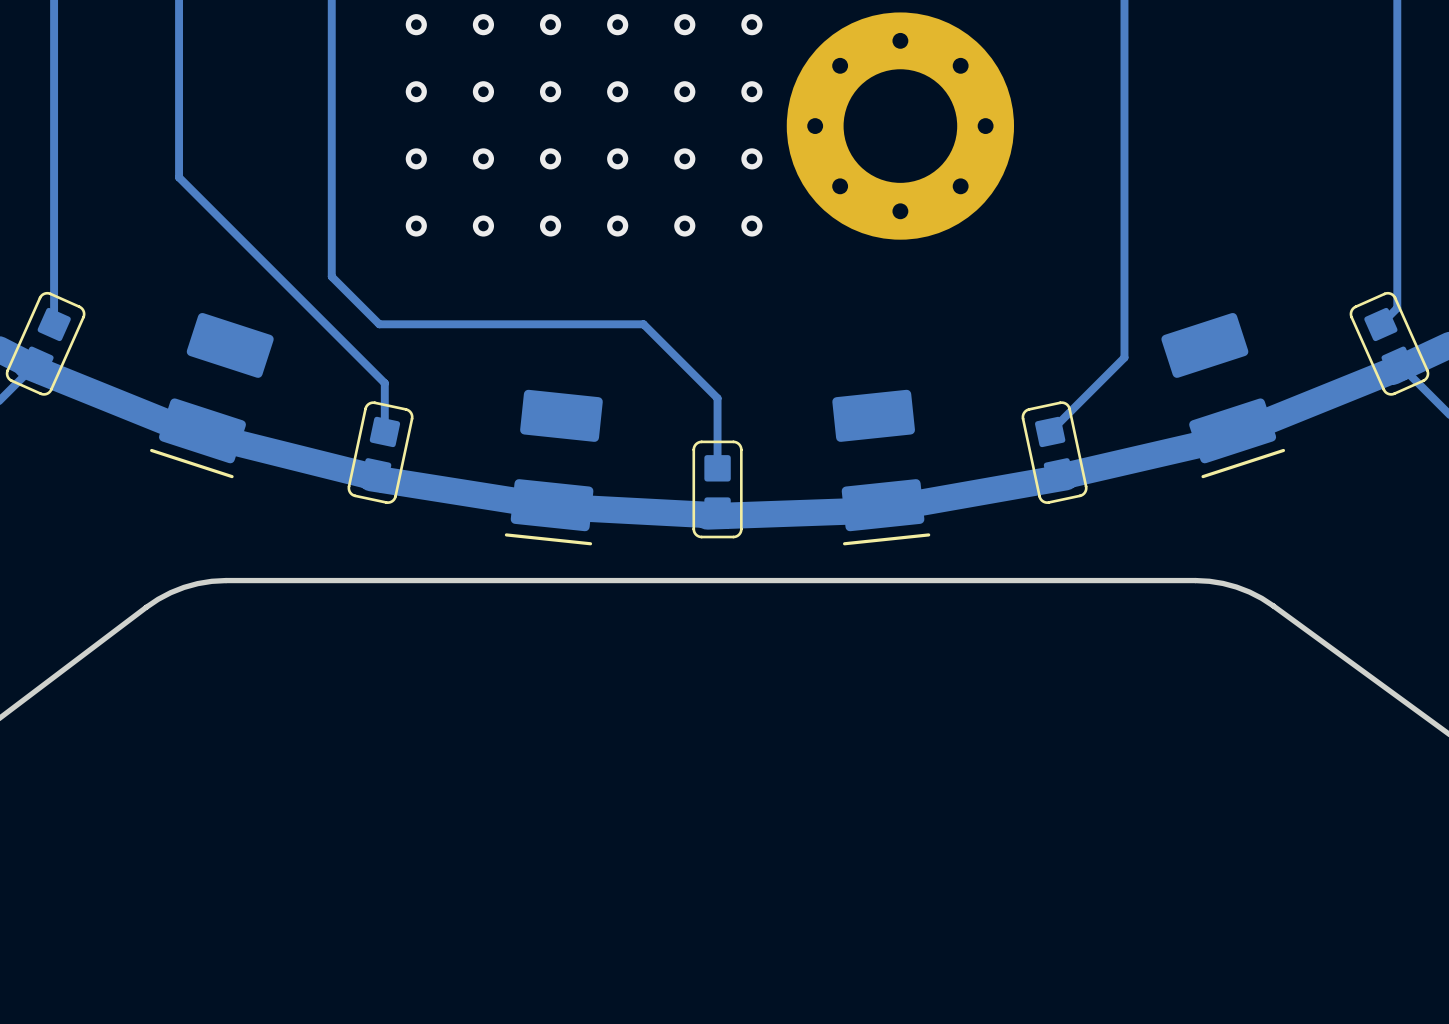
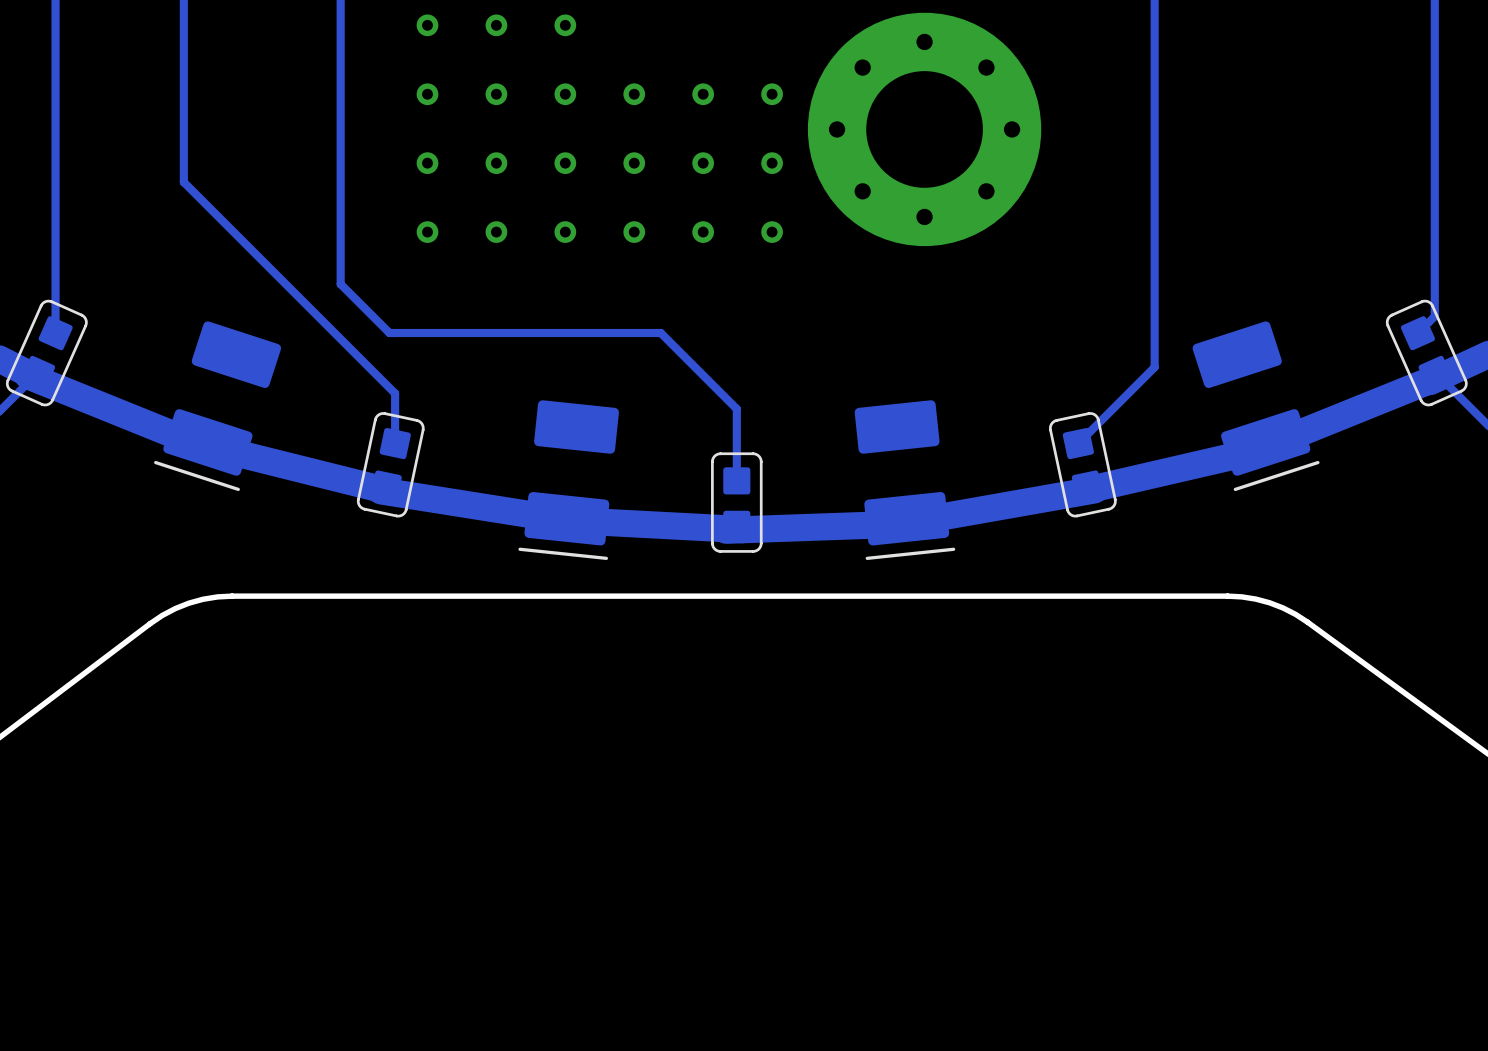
via: (617, 24) -> none
via: (684, 24) -> none
via: (751, 24) -> none

